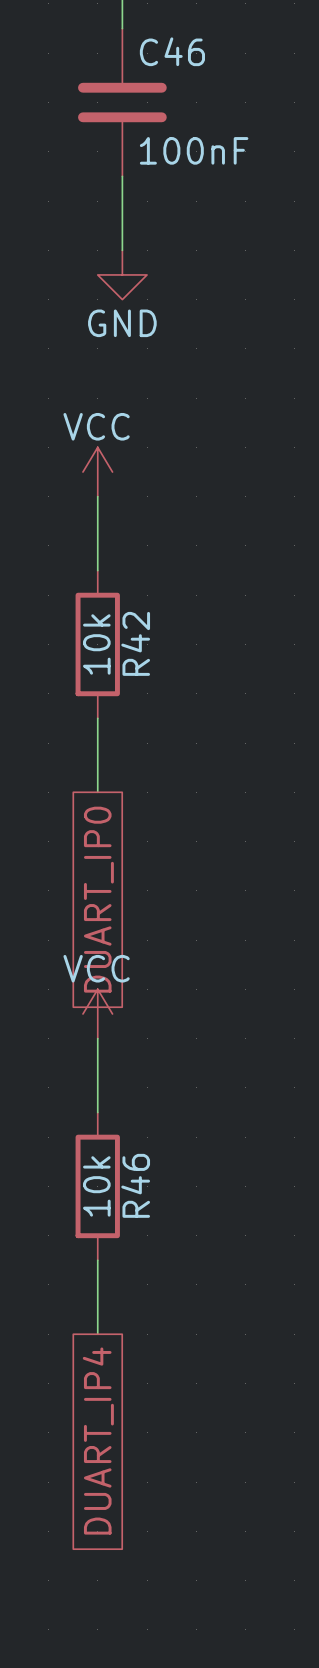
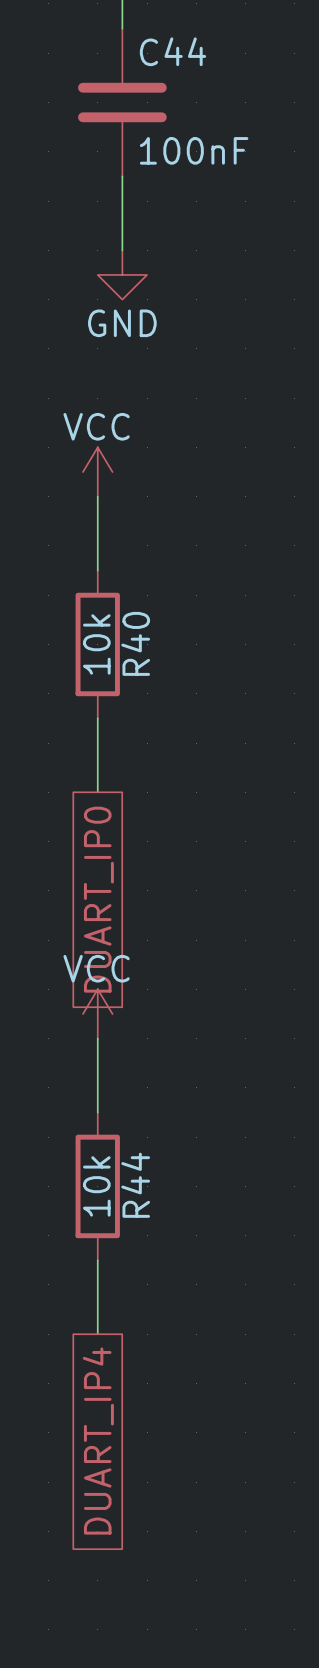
C46 name: C46 (172, 51) -> C44 (173, 51)
R42 name: R42 (135, 643) -> R40 (135, 643)
R46 name: R46 (135, 1185) -> R44 (135, 1185)

